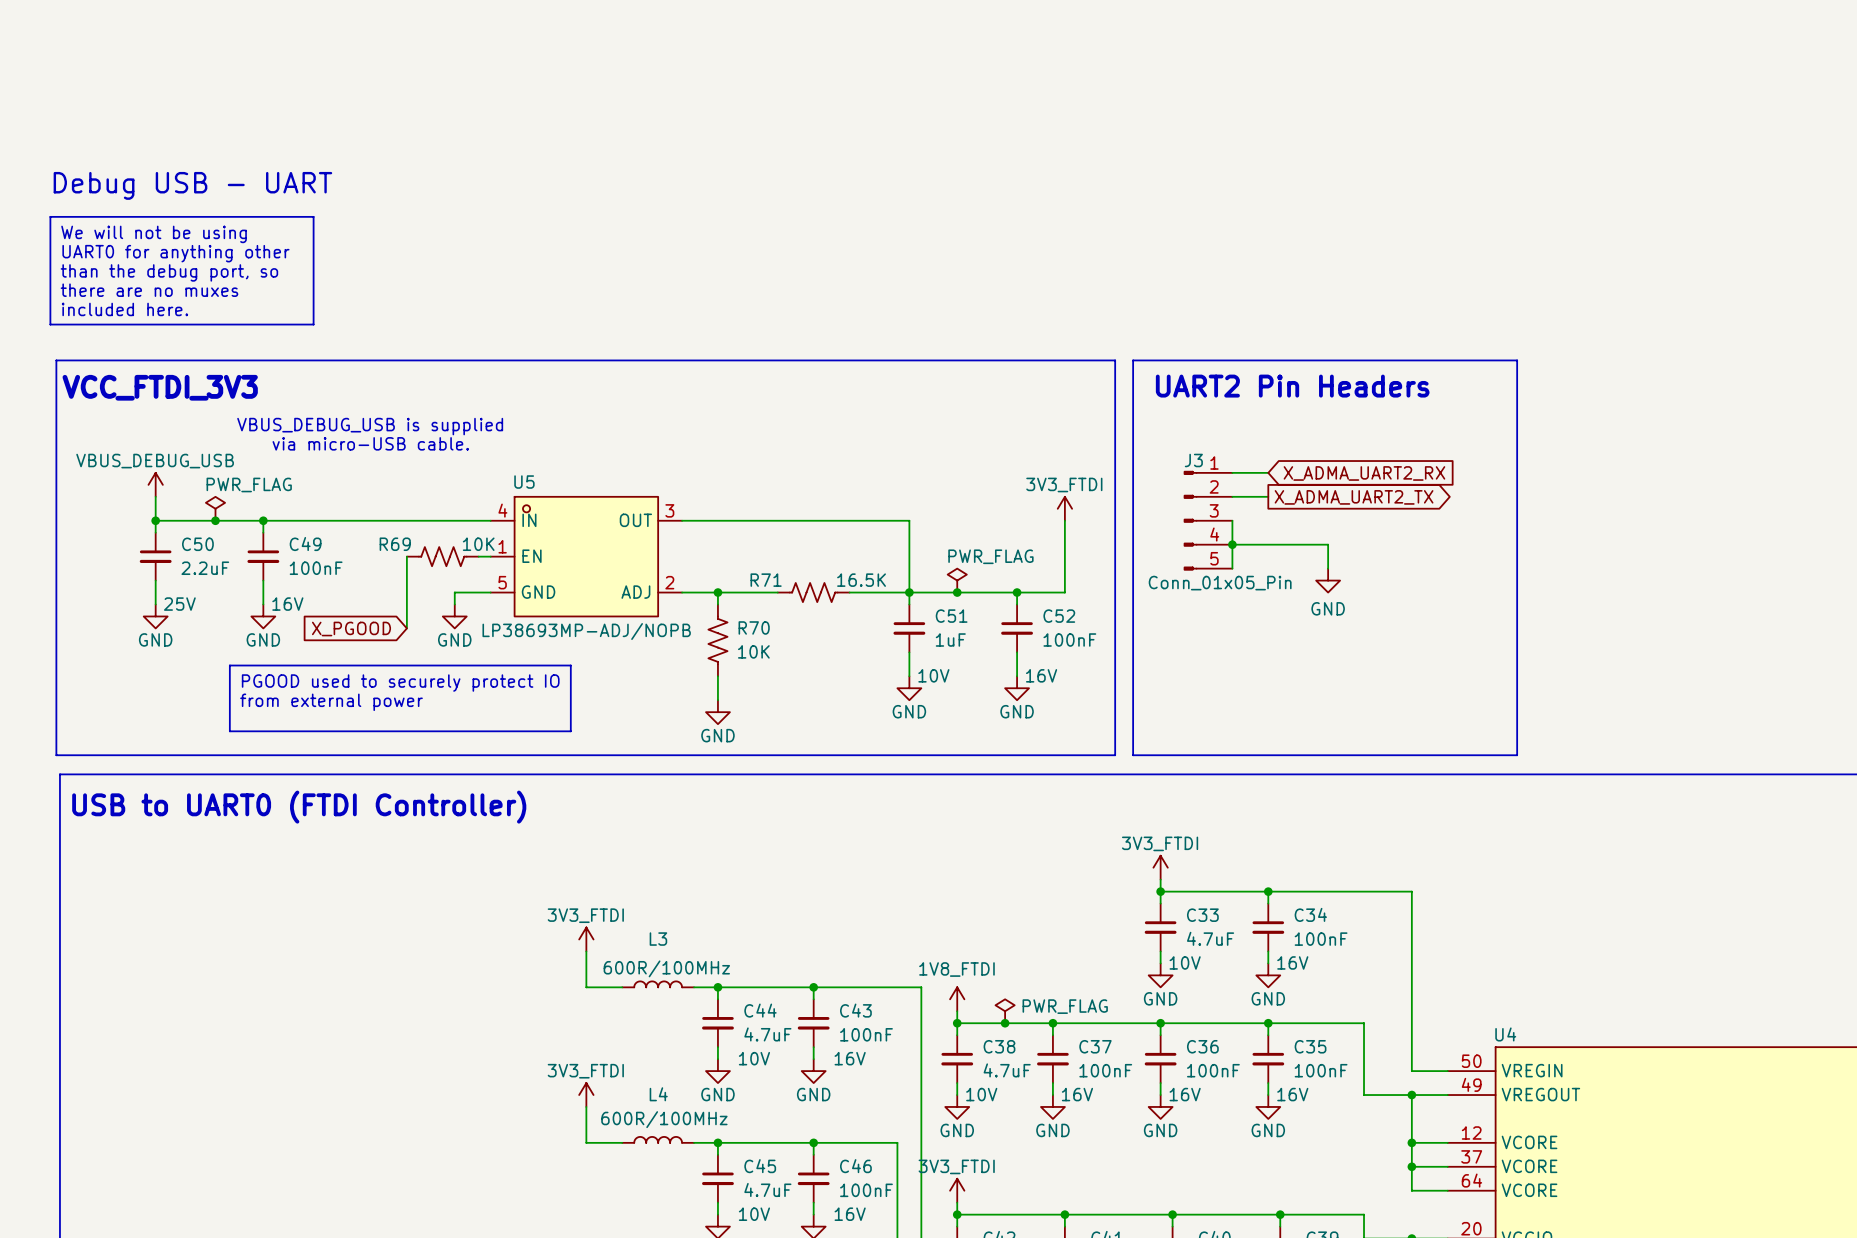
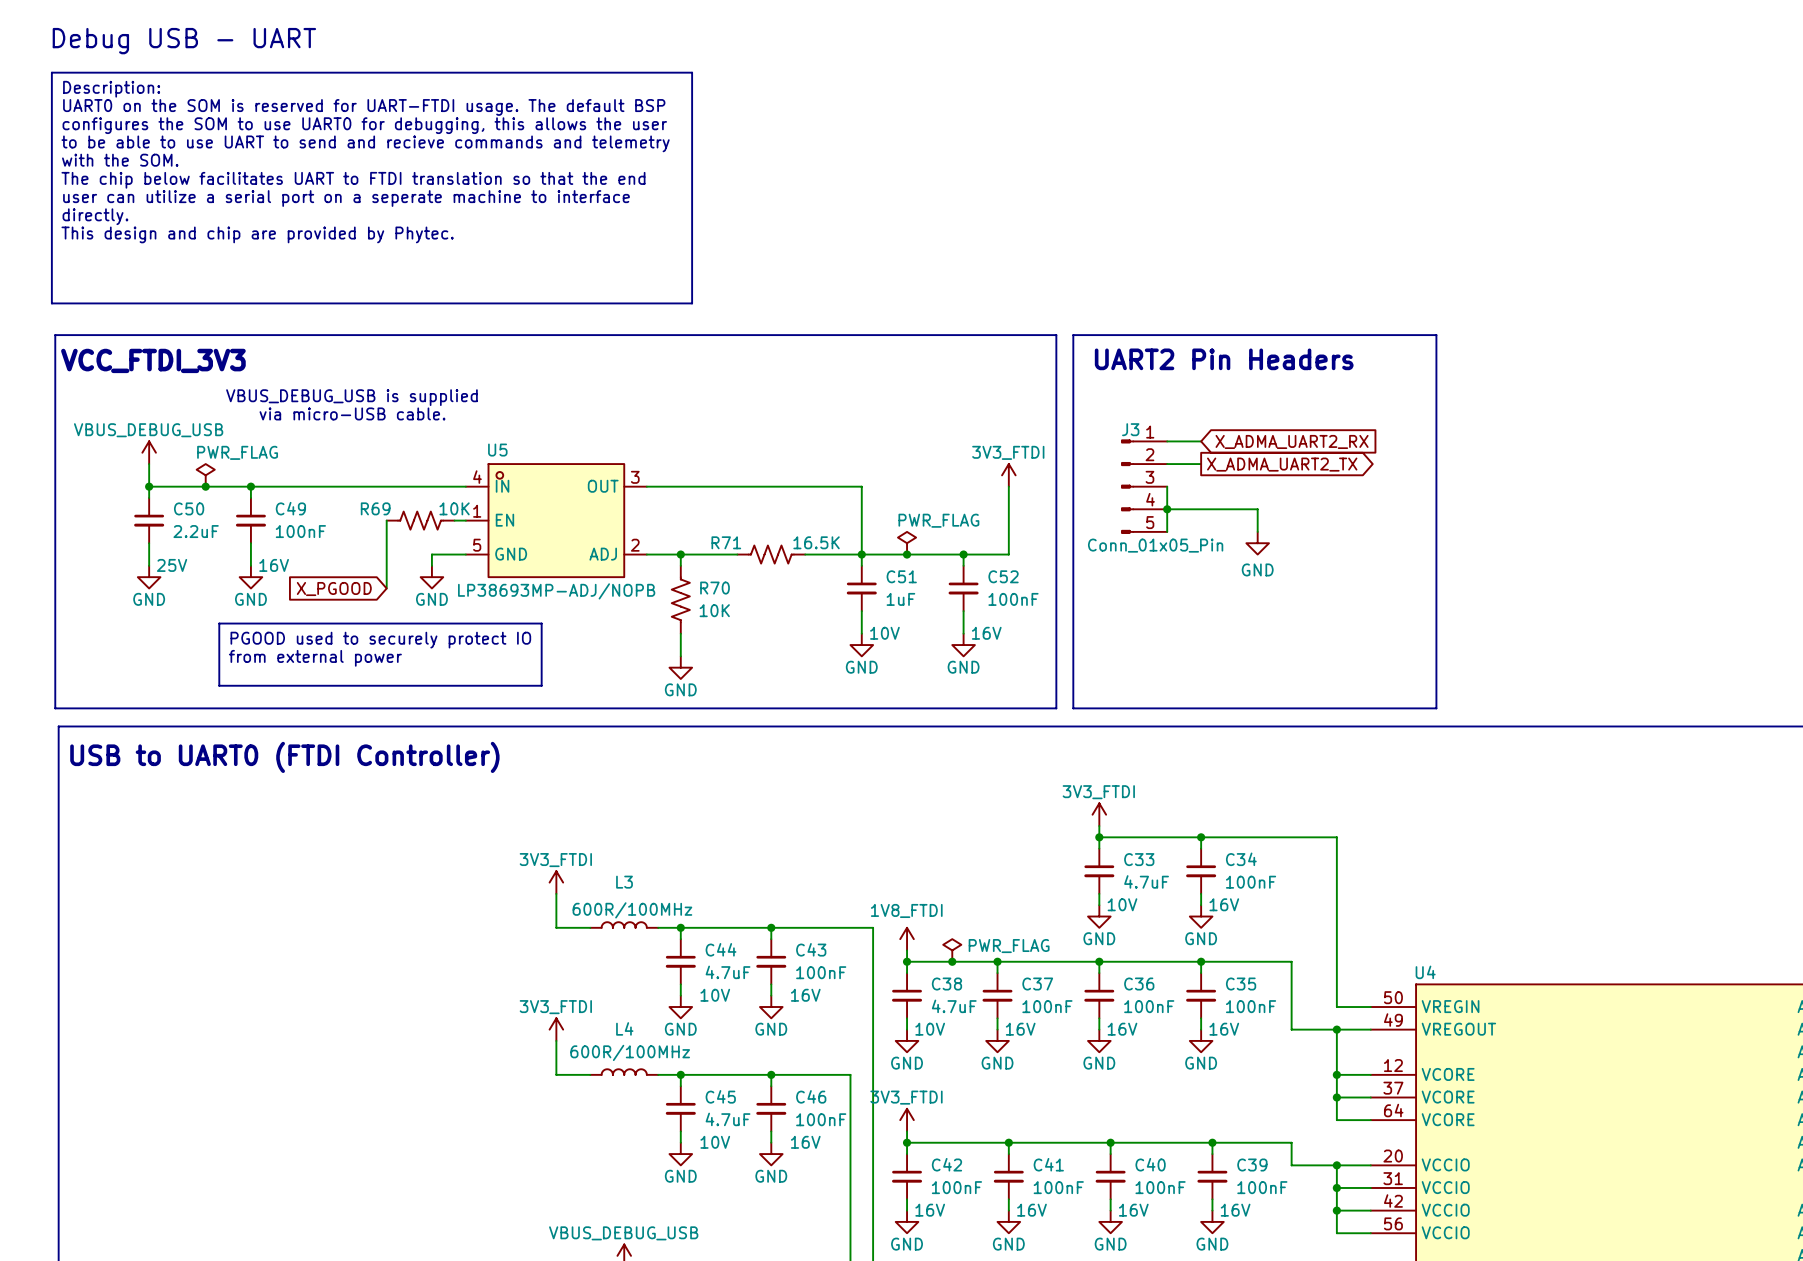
line: none -> (51, 72) (692, 72) (692, 303) (51, 303) (51, 72)
text: none -> Description: (111, 89)
text: none -> UART0 on the SOM is reserved for UART-FTDI usage. The default BSP (364, 107)
text: none -> configures the SOM to use UART0 for debugging, this allows the user (364, 125)
text: none -> to be able to use UART to send and recieve commands and telemetry (365, 143)
text: none -> with the SOM. (120, 160)
text position: Debug USB - UART (192, 185) -> Debug USB - UART (184, 41)
text: none -> The chip below facilitates UART to FTDI translation so that the end (353, 180)
text: none -> user can utilize a serial port on a seperate machine to interface (346, 198)
line: (50, 216) (313, 216) (313, 324) (50, 324) (50, 216) -> none
text: We will not be using (154, 234) -> directly. (95, 216)
text: UART0 for anything other (175, 253) -> This design and chip are provided by Phytec. (257, 234)
text: than the debug port, so (169, 272) -> none
text: there are no muxes (149, 290) -> none
text: included here. (124, 309) -> none

